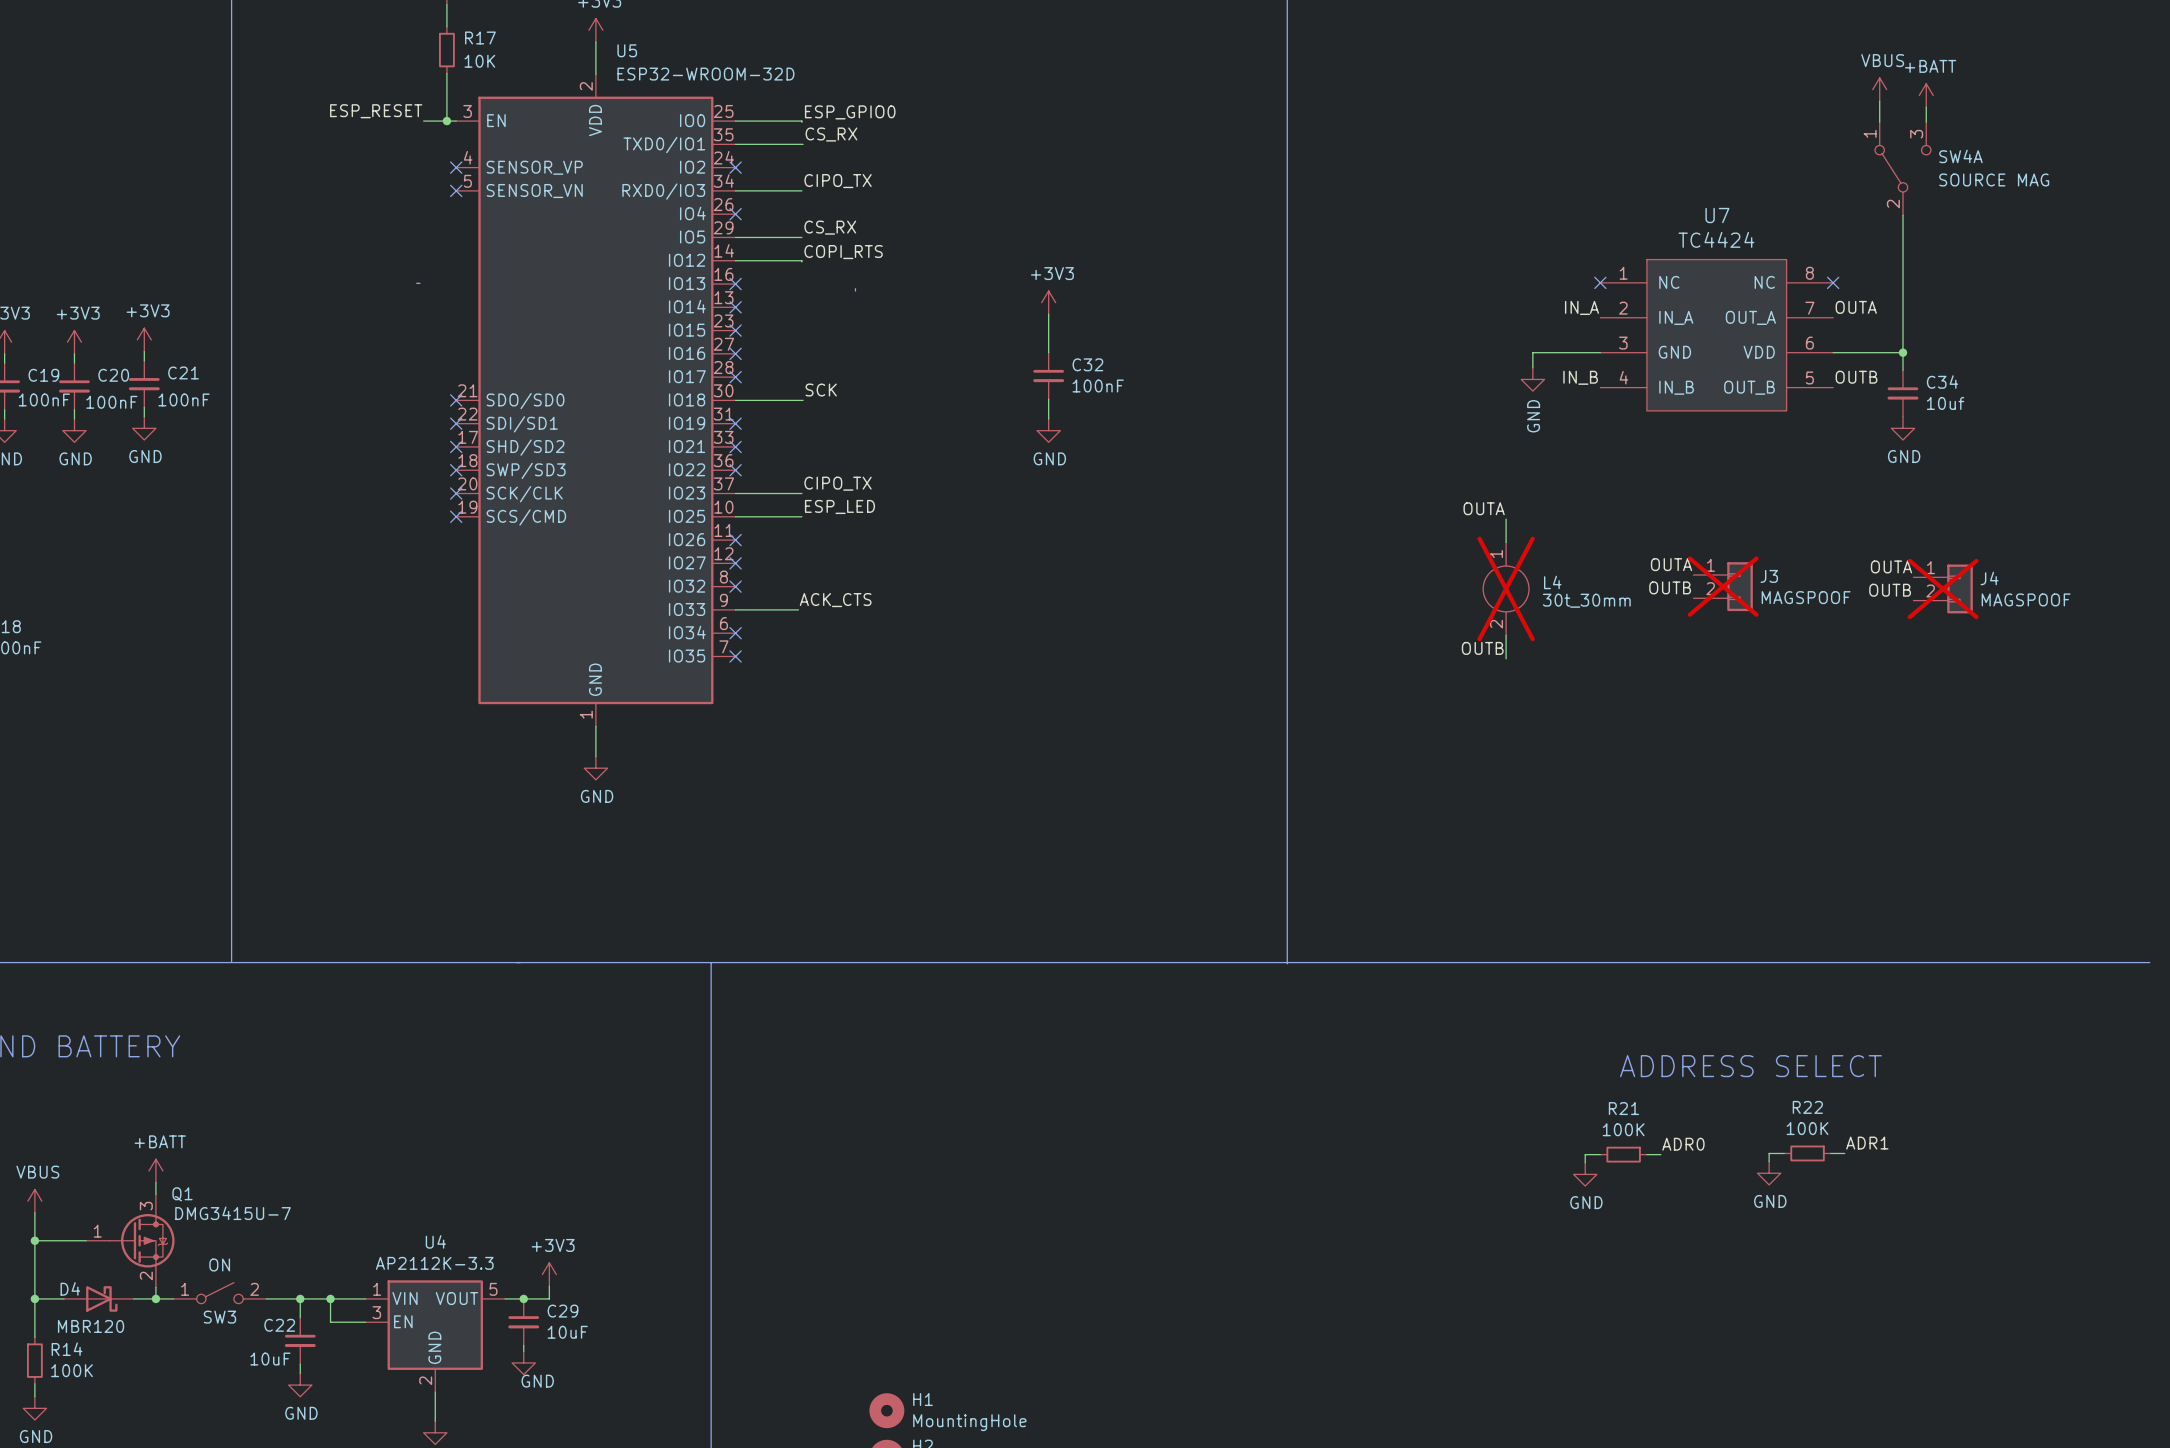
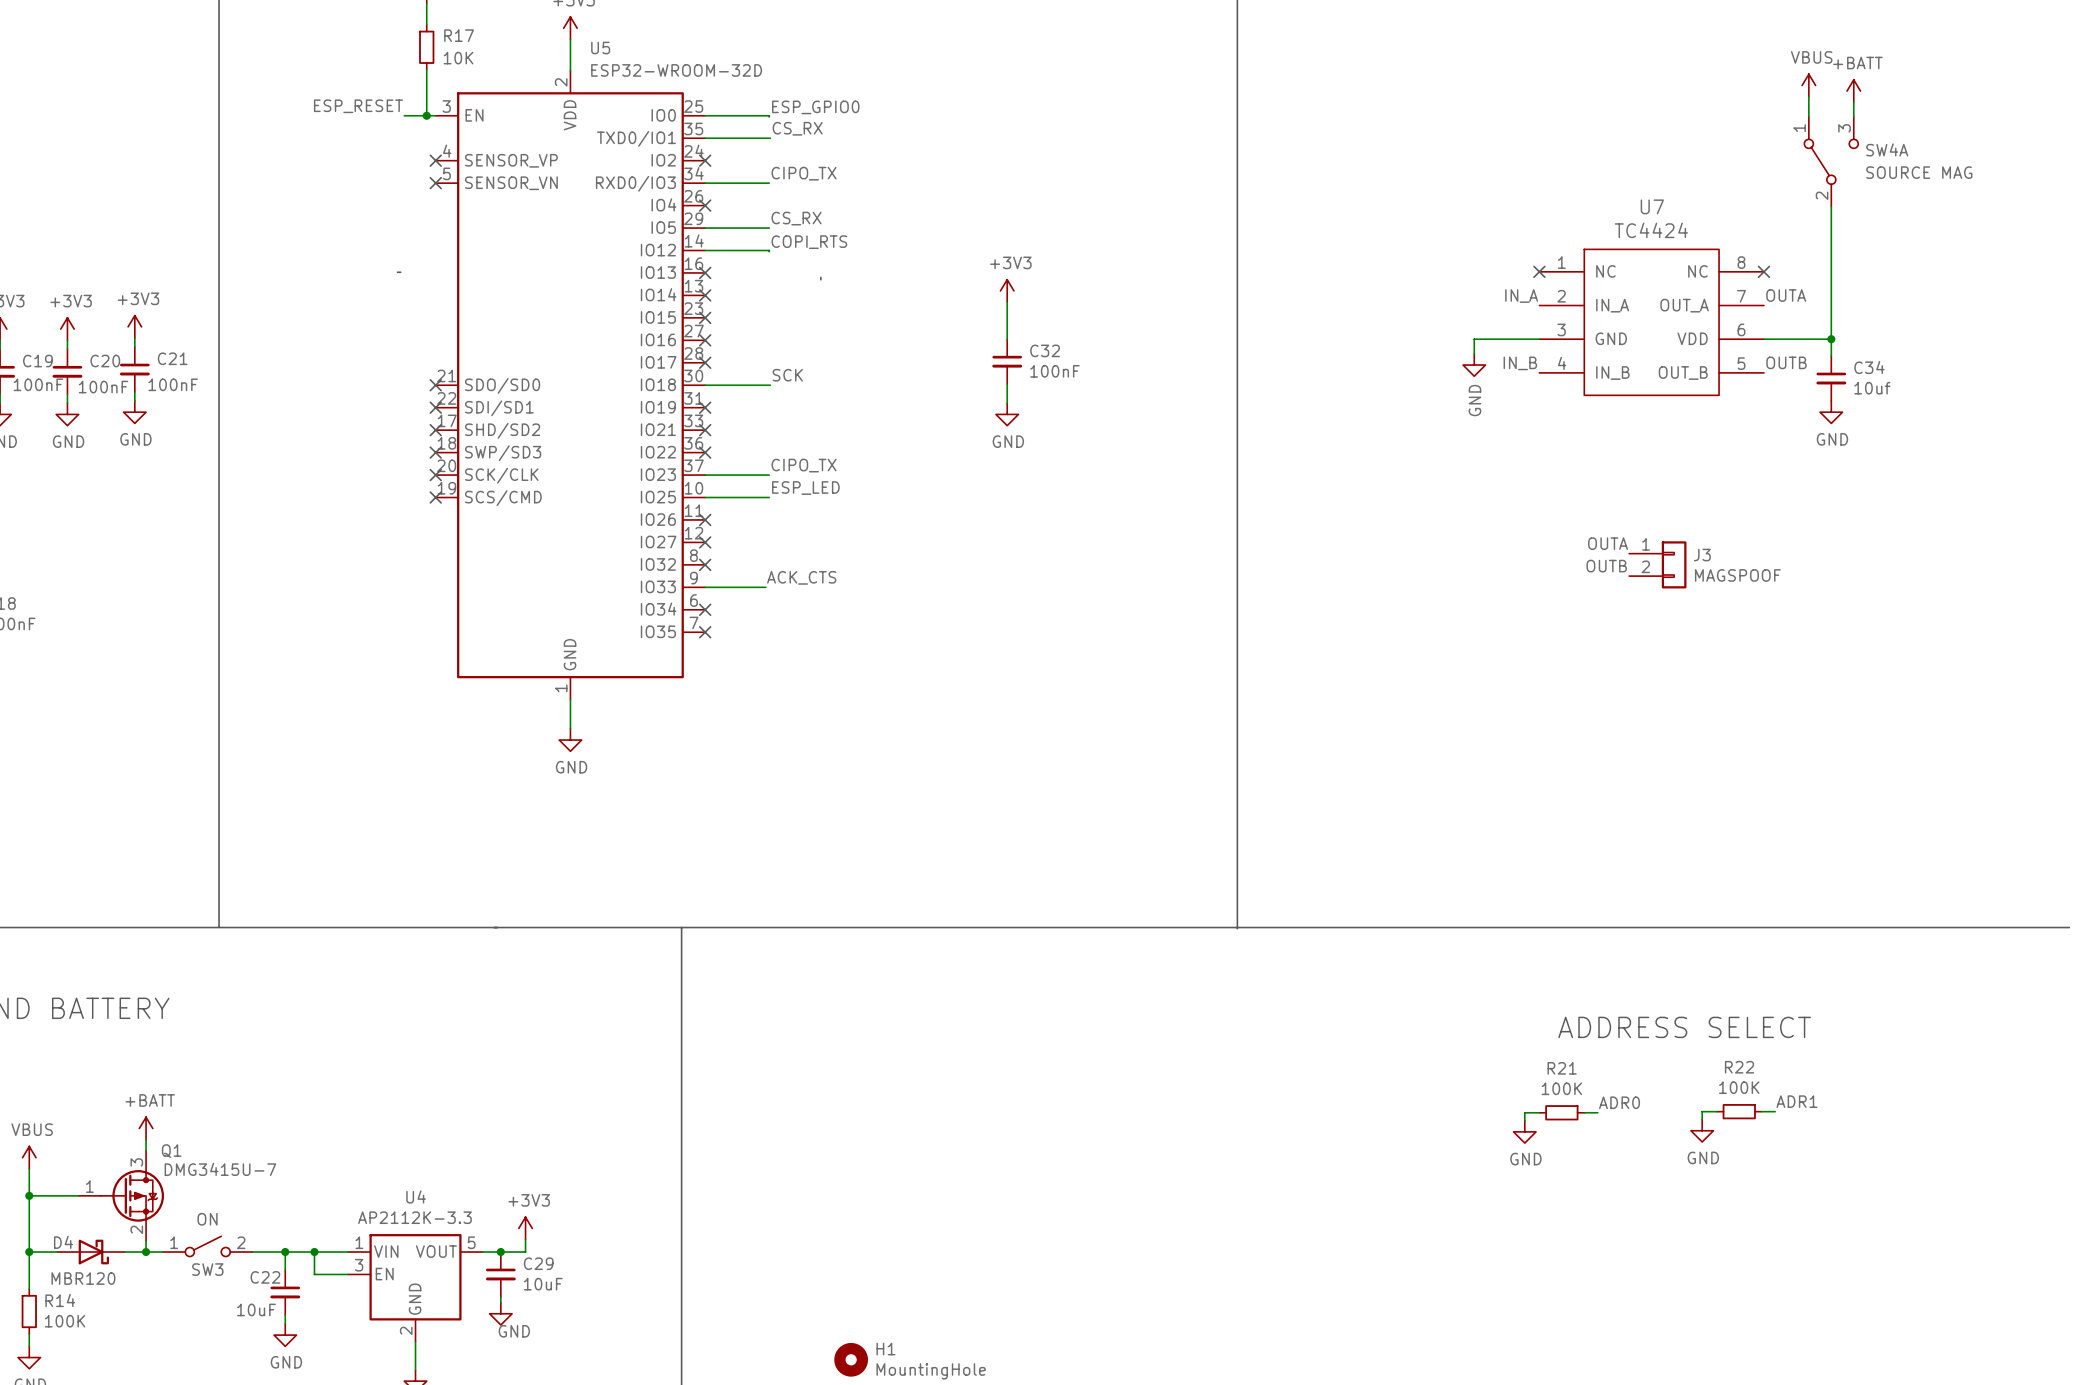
label: OUTA (1484, 508) -> none
wire: (1506, 519) (1506, 542) -> none
label: OUTA (1891, 566) -> none
J3 do-not-place cross: (1723, 586) -> none
L4: 30t_30mm (1506, 588) -> none
J4: MAGSPOOF (1943, 588) -> none
label: OUTB (1890, 590) -> none
wire: (1506, 635) (1506, 658) -> none
label: OUTB (1482, 648) -> none

